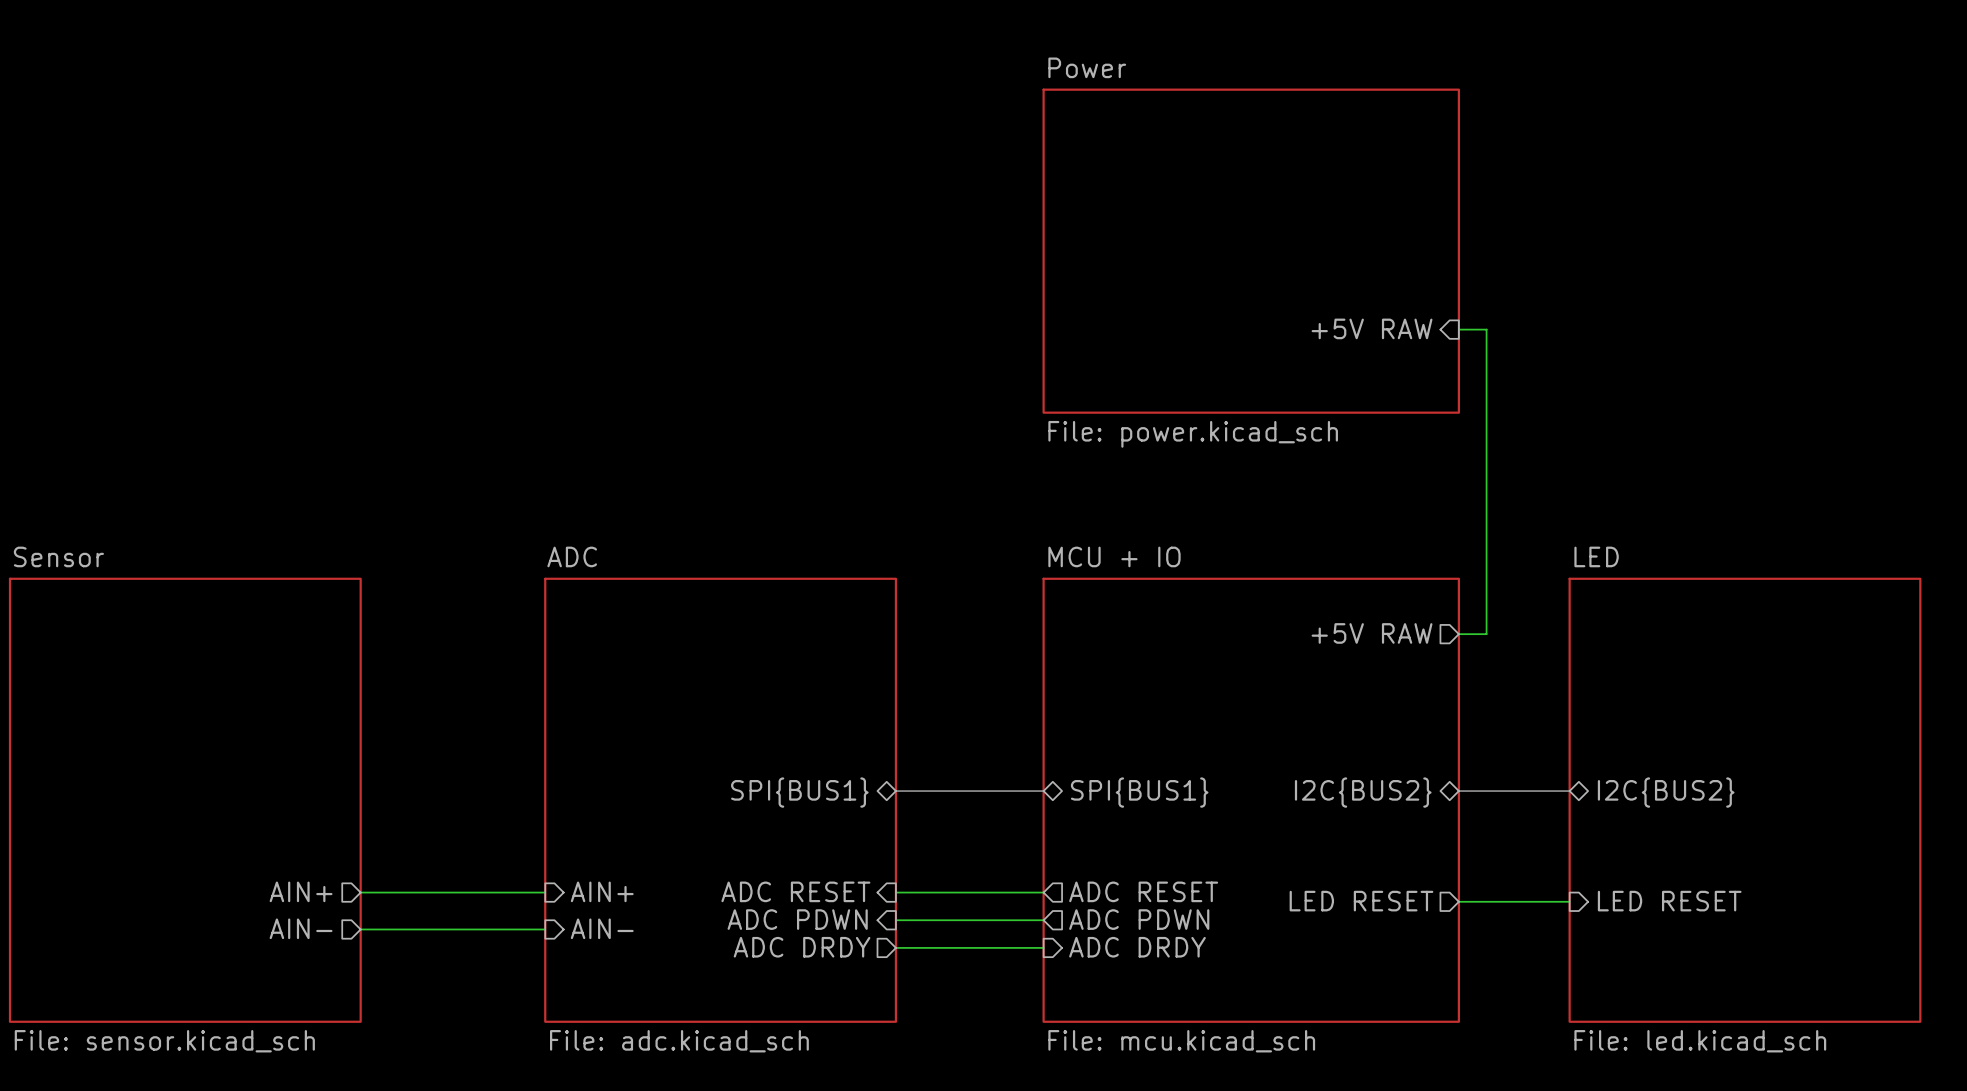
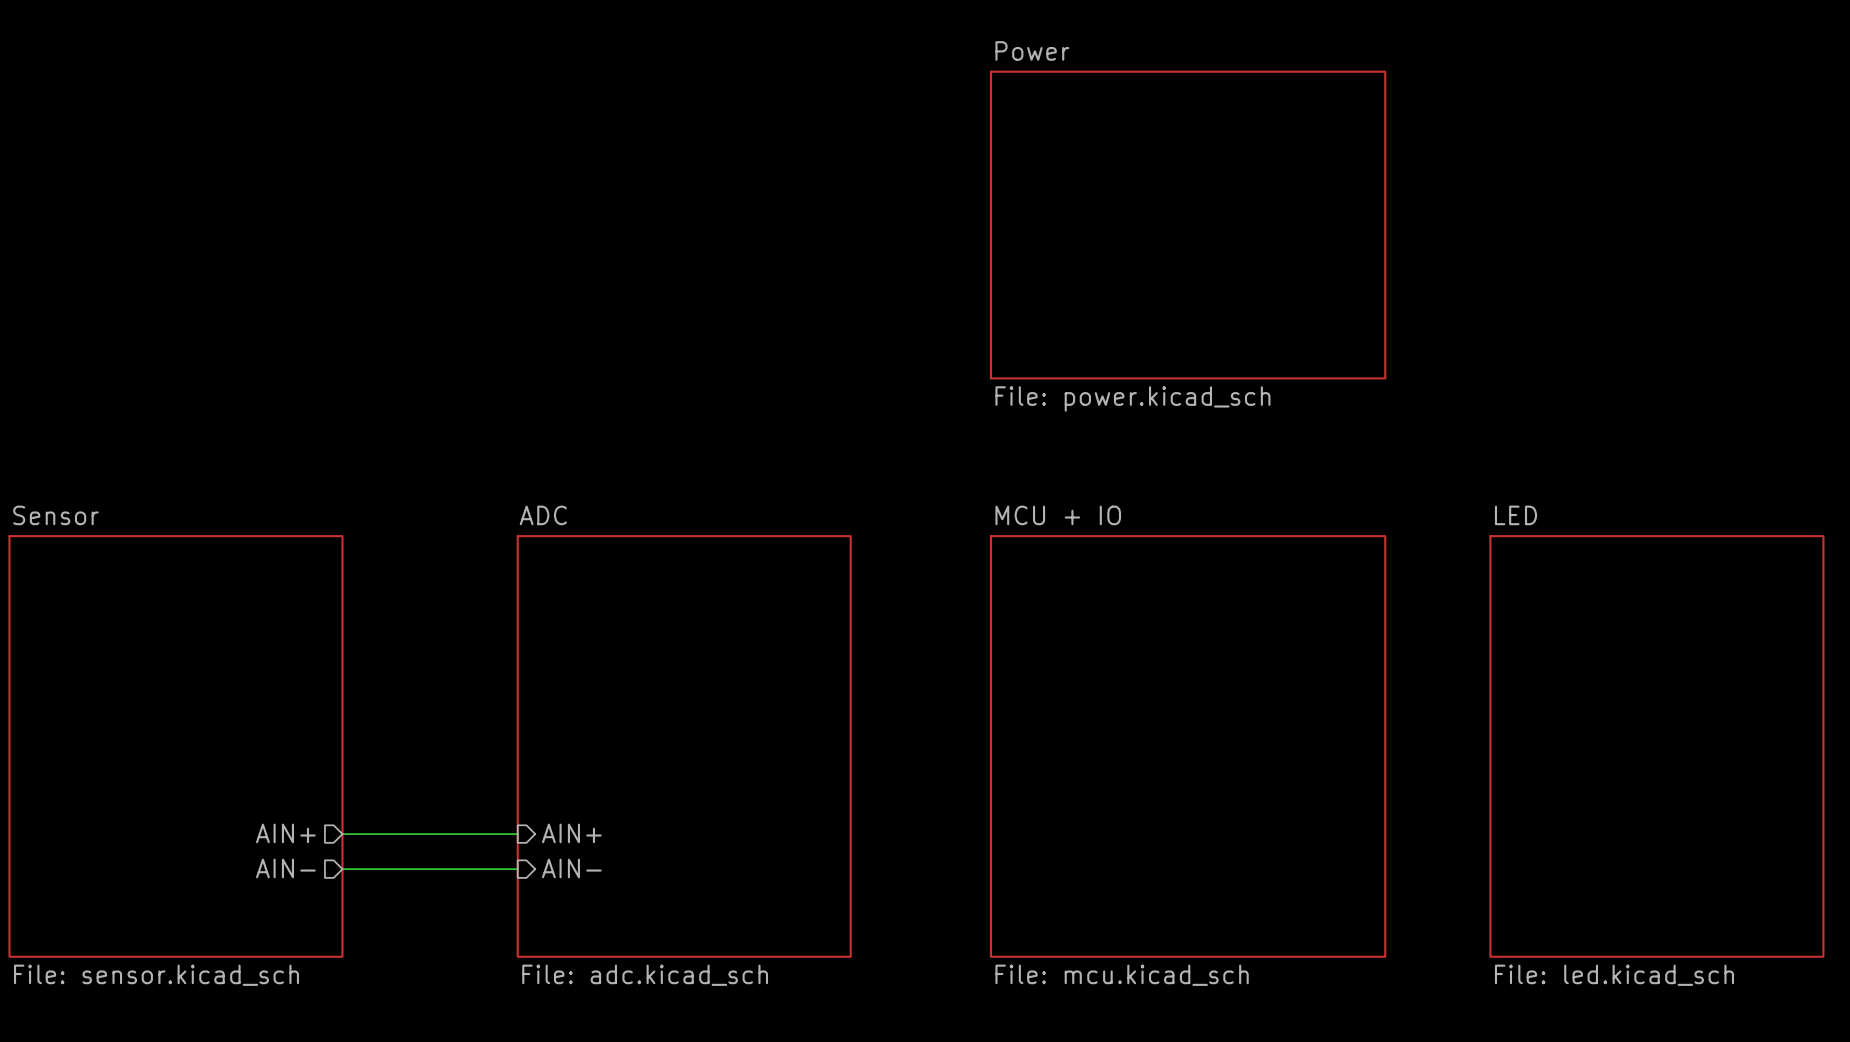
sheet pin: +5V RAW (1372, 328) -> none
wire: (1458, 329) (1486, 329) (1486, 634) (1458, 634) -> none
sheet pin: +5V RAW (1372, 633) -> none
bus: (895, 791) (1043, 791) -> none
bus: (1458, 791) (1569, 791) -> none
sheet pin: SPI{BUS1} (799, 792) -> none
sheet pin: SPI{BUS1} (1139, 792) -> none
sheet pin: I2C{BUS2} (1363, 792) -> none
sheet pin: I2C{BUS2} (1666, 792) -> none
sheet pin: ADC RESET (795, 891) -> none
sheet pin: ADC RESET (1143, 891) -> none
wire: (895, 892) (1043, 892) -> none
sheet pin: LED RESET (1361, 901) -> none
wire: (1458, 901) (1569, 901) -> none
sheet pin: LED RESET (1669, 901) -> none
sheet pin: ADC PDWN (797, 919) -> none
sheet pin: ADC PDWN (1139, 919) -> none
wire: (895, 920) (1043, 920) -> none
sheet pin: ADC DRDY (802, 947) -> none
wire: (895, 947) (1043, 947) -> none
sheet pin: ADC DRDY (1137, 947) -> none

